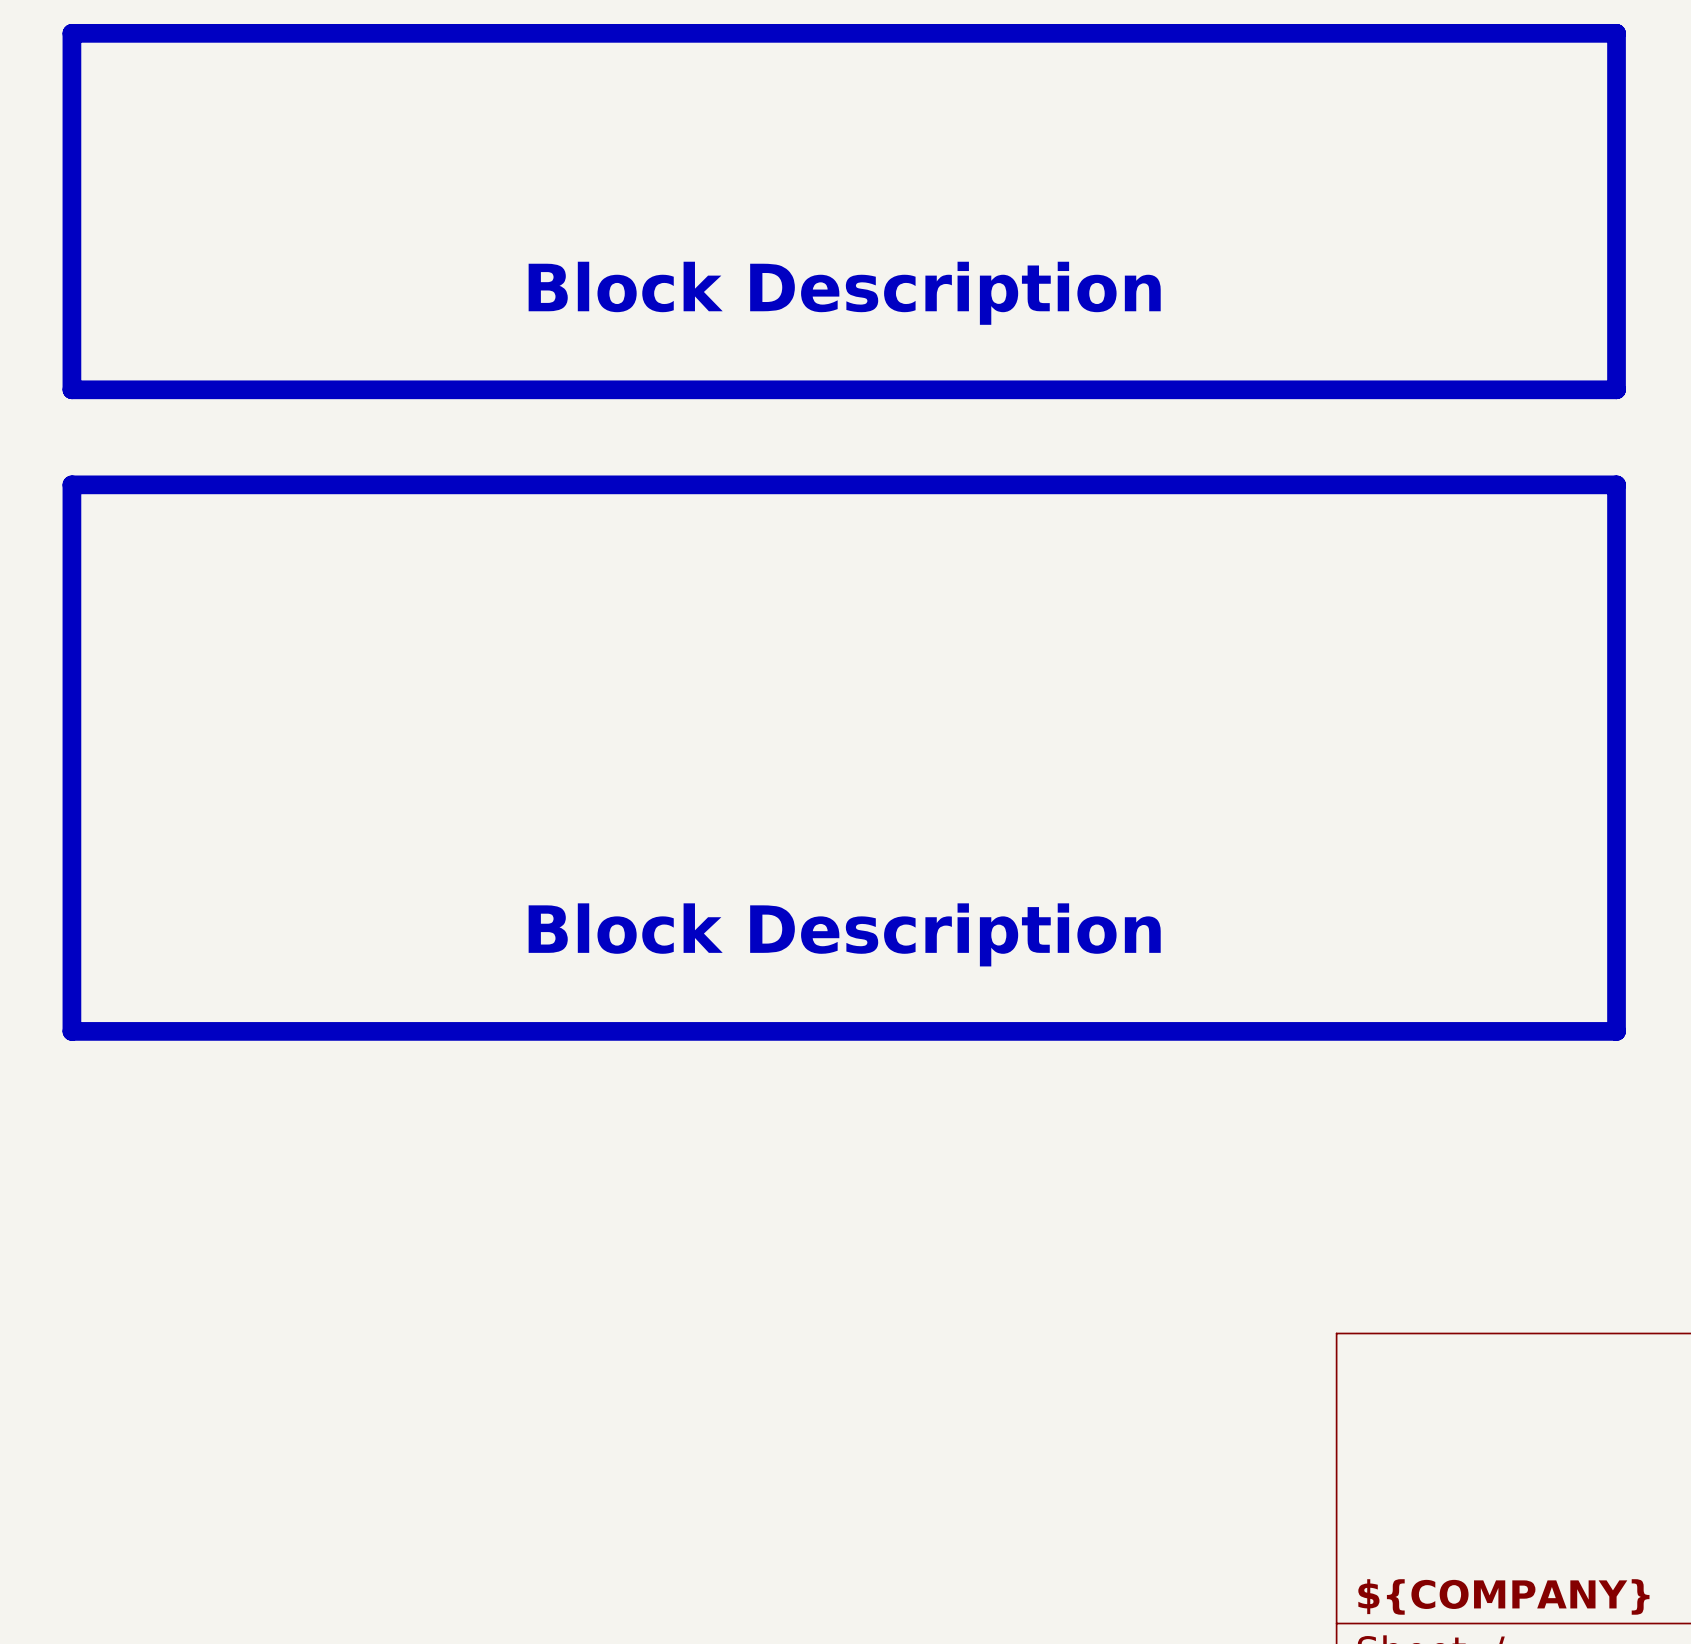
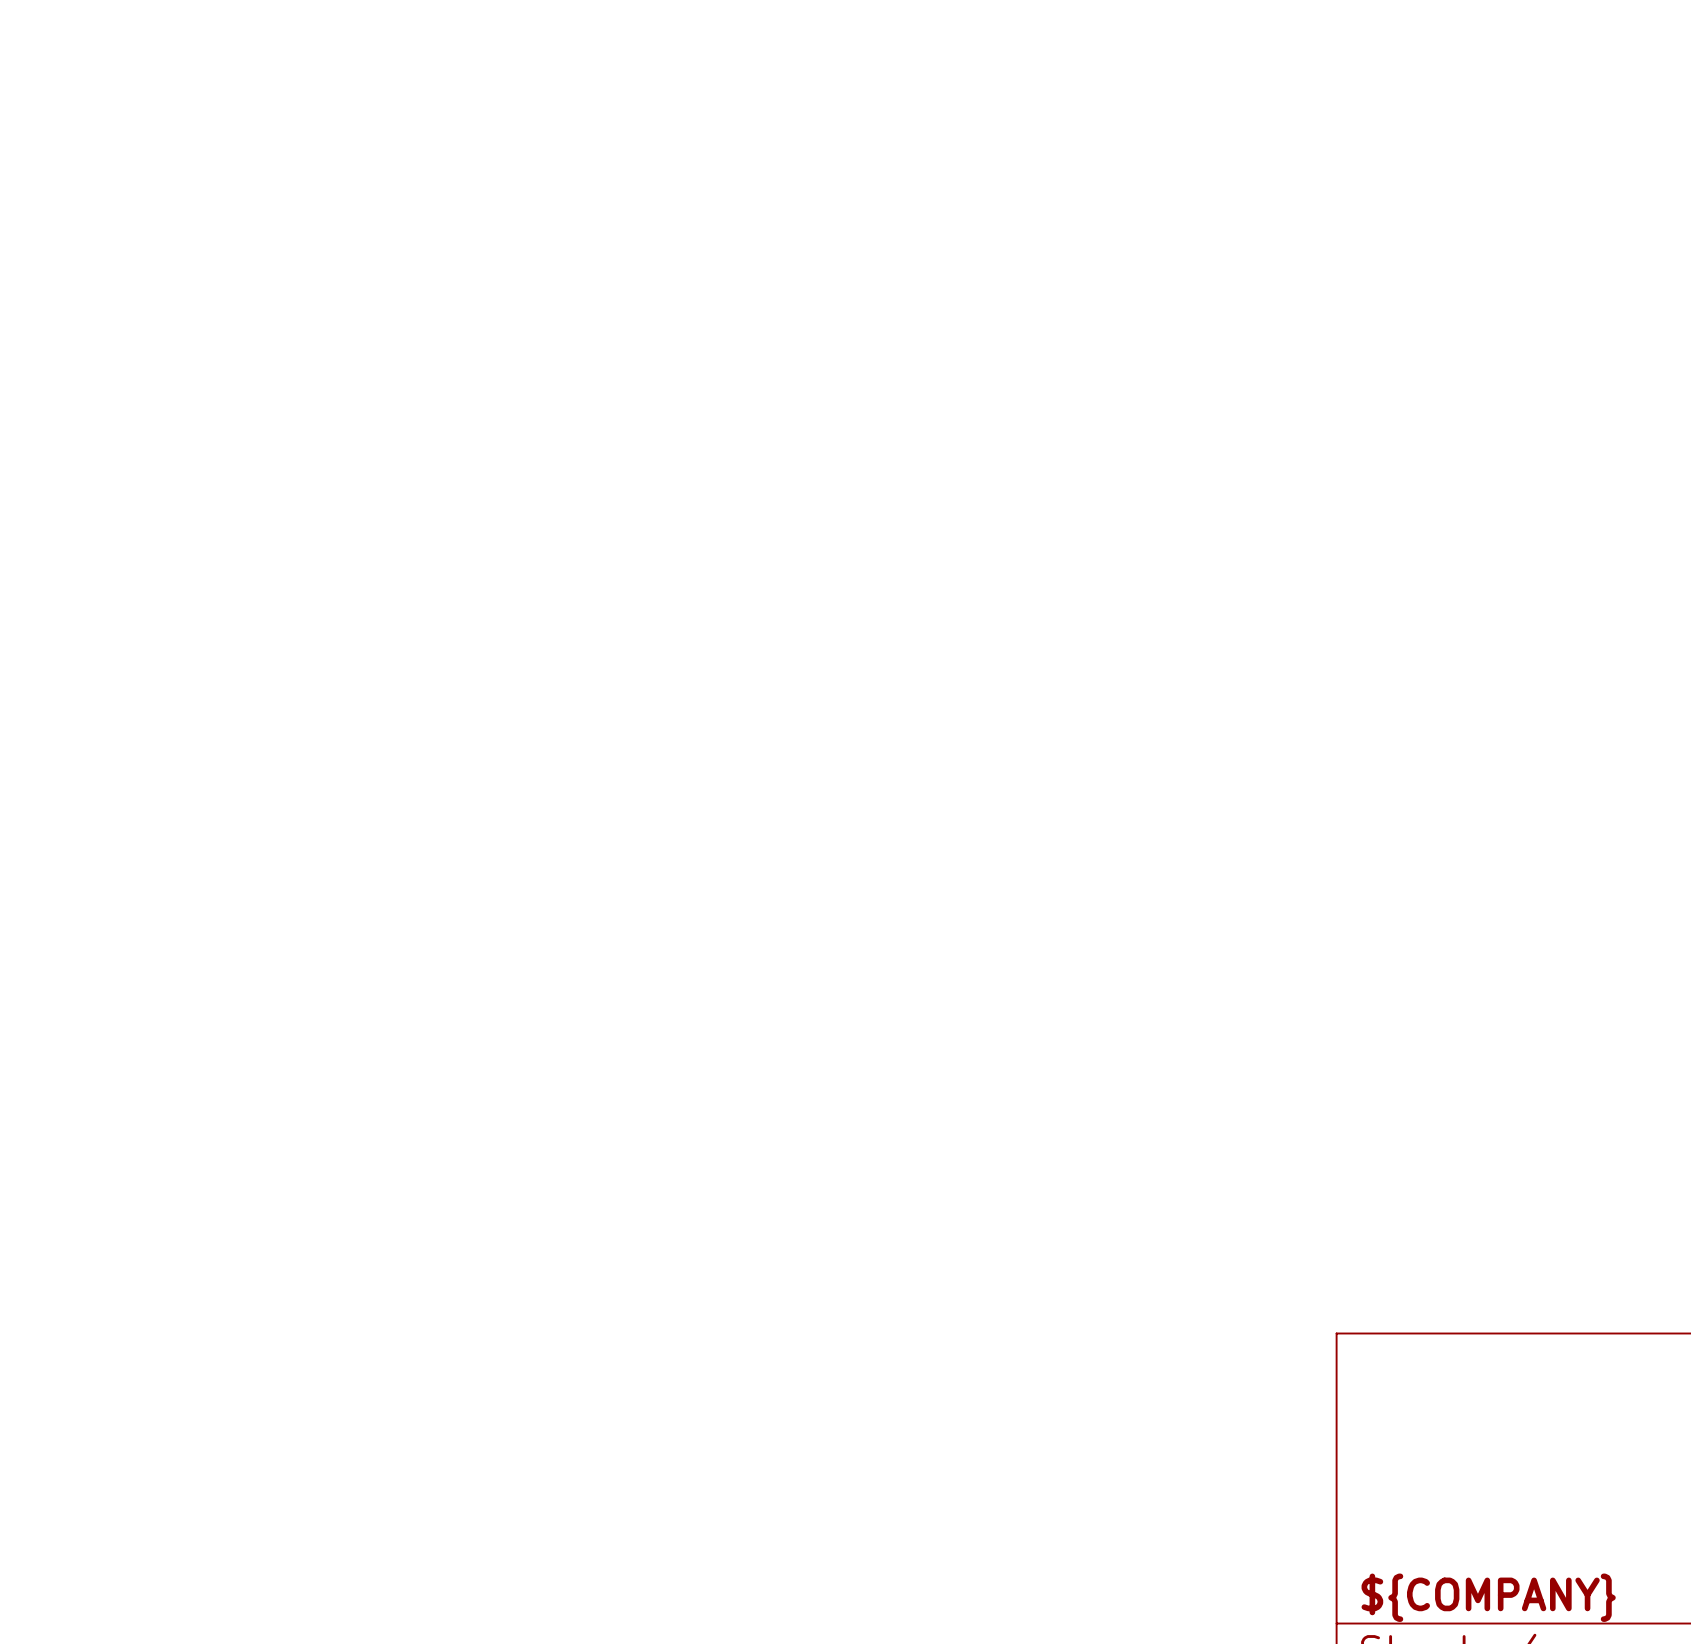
line: (71, 33) (1616, 33) (1616, 389) (71, 389) (71, 33) -> none
text: Block Description (844, 293) -> none
line: (71, 484) (71, 1031) (1616, 1031) (1616, 484) (71, 484) -> none
text: Block Description (844, 934) -> none

